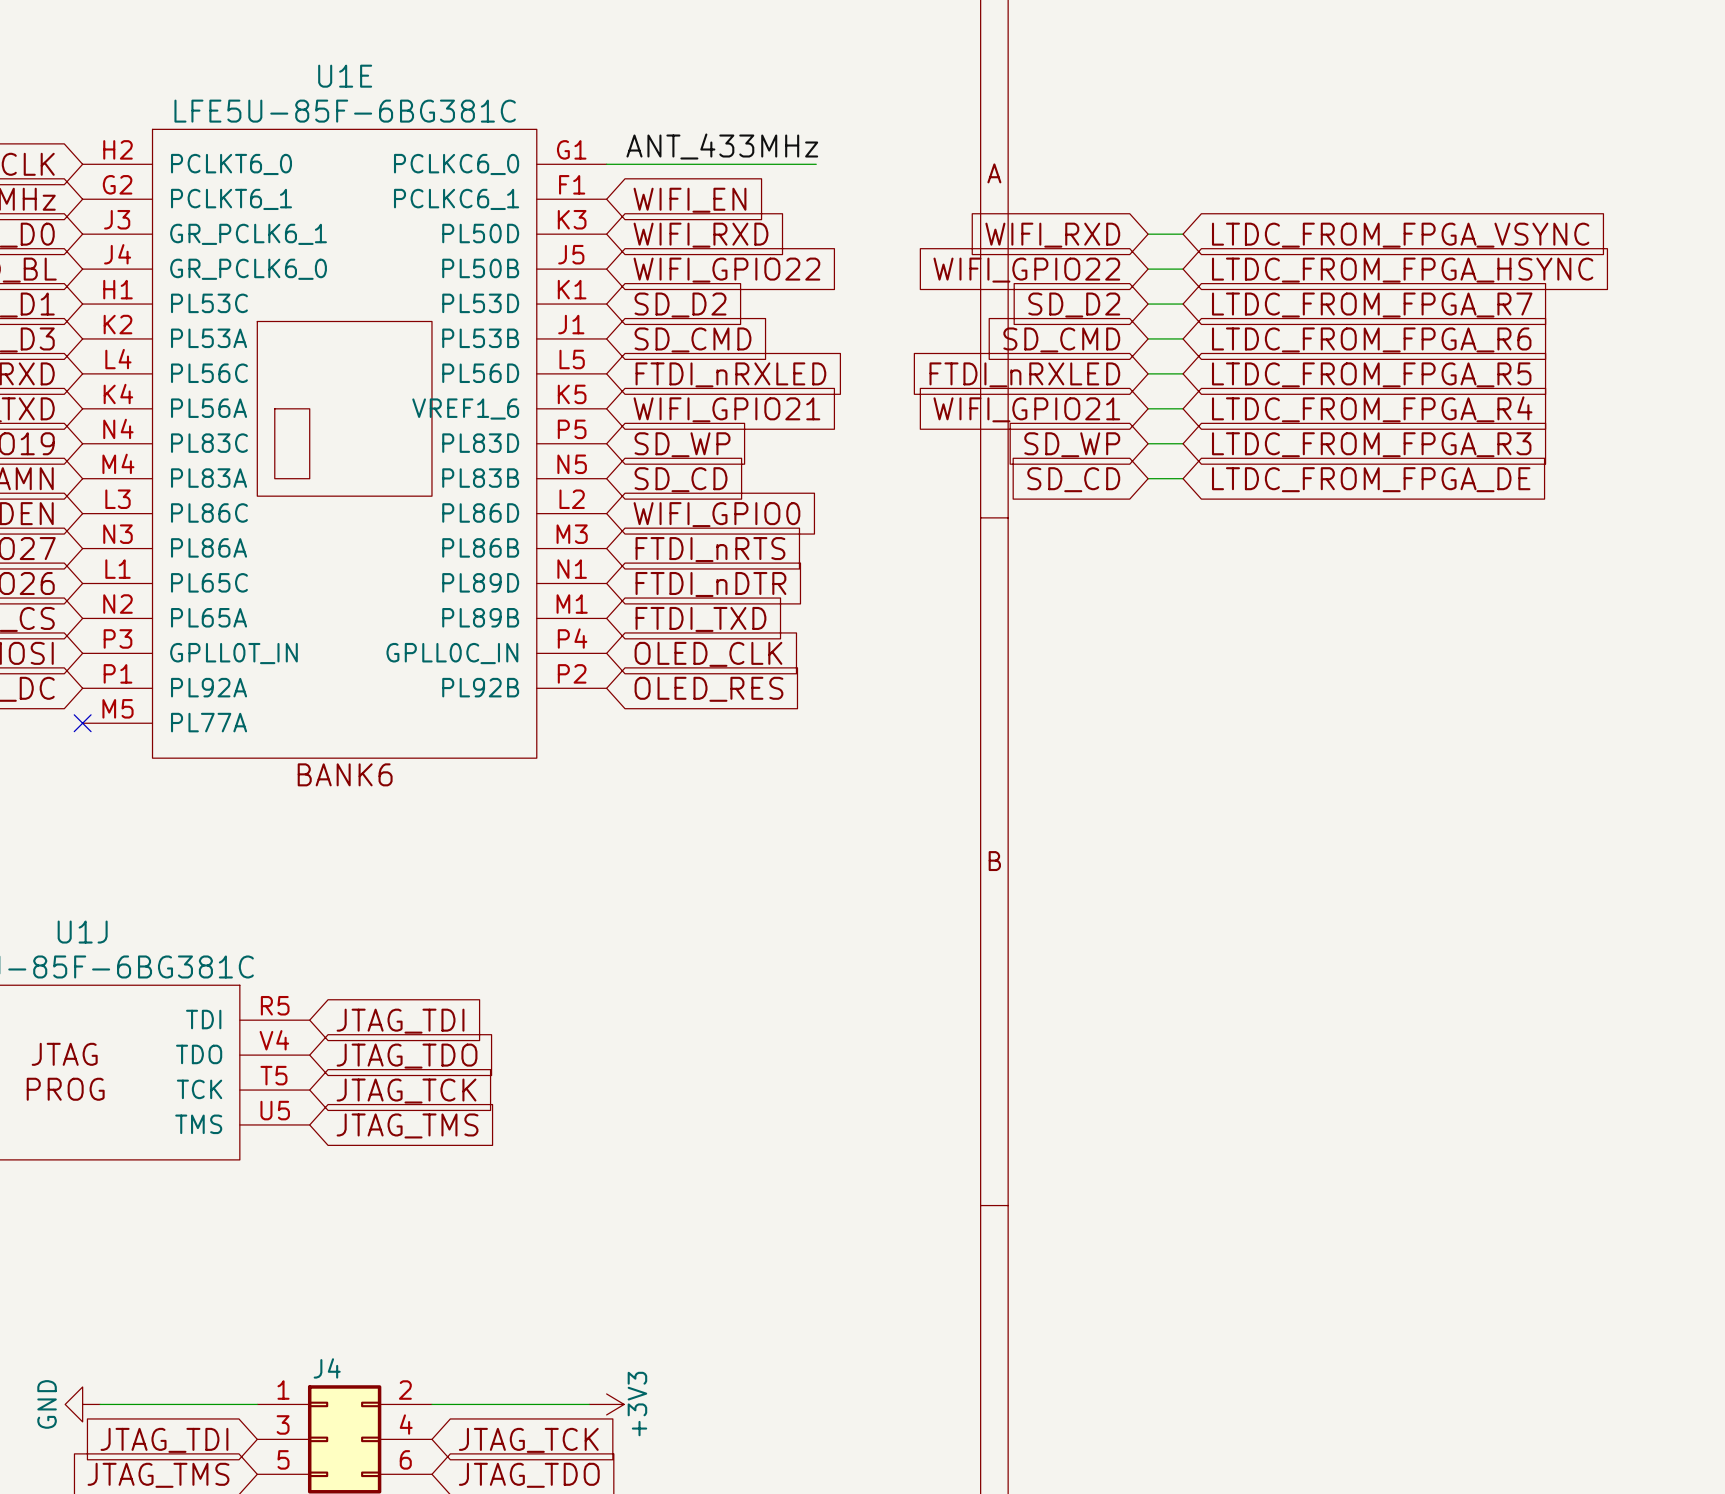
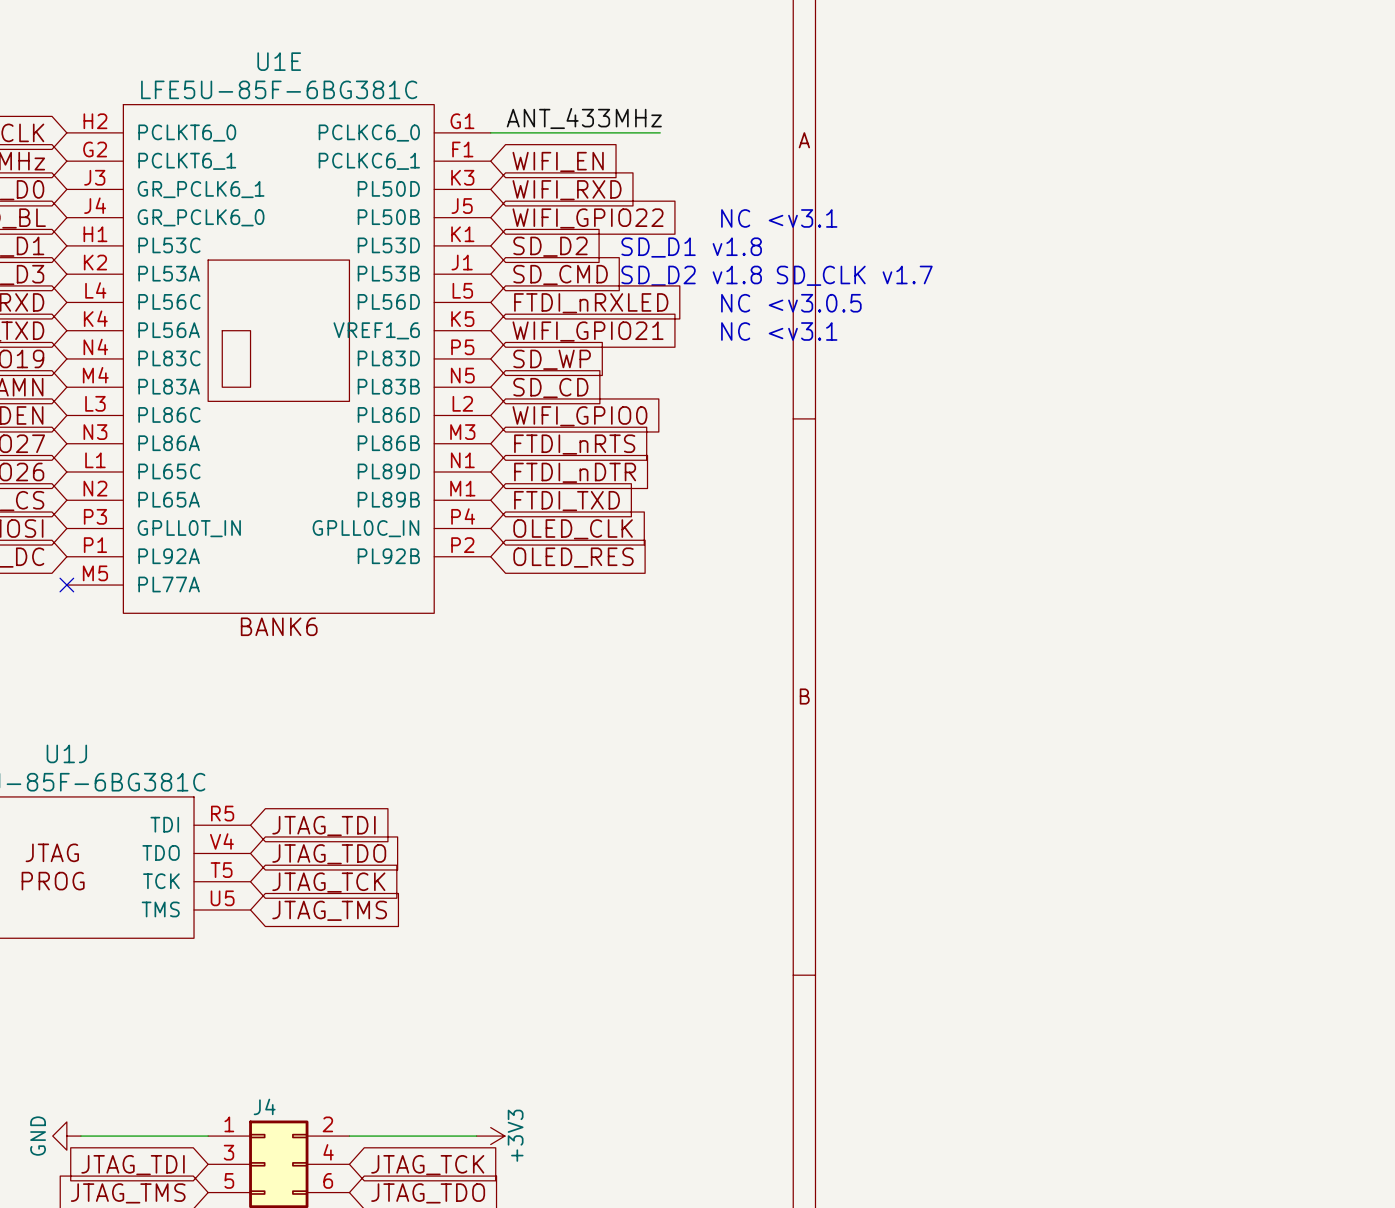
wire: (1148, 234) (1183, 234) -> none
global label: WIFI_RXD (1052, 235) -> none
global label: LTDC_FROM_FPGA_VSYNC (1400, 235) -> none
wire: (1148, 269) (1183, 269) -> none
text: none -> NC <v3.1 (779, 218)
global label: WIFI_GPIO22 (1026, 270) -> none
global label: LTDC_FROM_FPGA_HSYNC (1402, 270) -> none
wire: (1148, 304) (1183, 304) -> none
global label: SD_D2 (1074, 305) -> none
global label: LTDC_FROM_FPGA_R7 (1372, 305) -> none
text: none -> SD_D1 v1.8 (691, 247)
wire: (1148, 338) (1183, 338) -> none
global label: SD_CMD (1061, 339) -> none
global label: LTDC_FROM_FPGA_R6 (1371, 339) -> none
text: none -> SD_D2 v1.8 (691, 275)
text: none -> SD_CLK v1.7 (854, 275)
wire: (1148, 373) (1183, 373) -> none
text: none -> NC <v3.0.5 (791, 303)
global label: FTDI_nRXLED (1024, 374) -> none
global label: LTDC_FROM_FPGA_R5 (1371, 374) -> none
wire: (1148, 408) (1183, 408) -> none
text: none -> NC <v3.1 (779, 331)
global label: WIFI_GPIO21 (1026, 409) -> none
global label: LTDC_FROM_FPGA_R4 (1372, 409) -> none
wire: (1148, 443) (1183, 443) -> none
global label: SD_WP (1072, 444) -> none
global label: LTDC_FROM_FPGA_R3 (1371, 444) -> none
wire: (1148, 478) (1183, 478) -> none
global label: SD_CD (1073, 479) -> none
global label: LTDC_FROM_FPGA_DE (1371, 479) -> none

